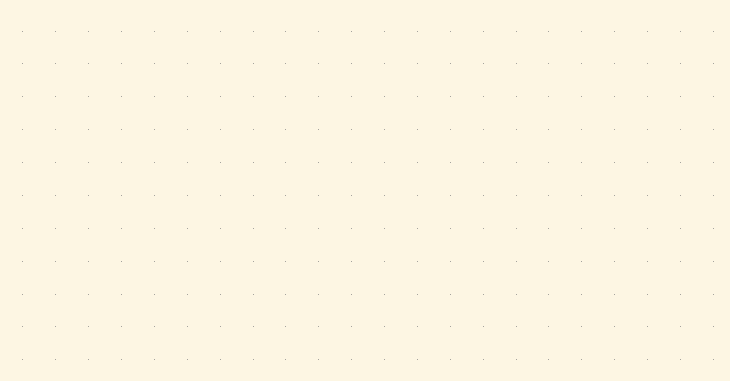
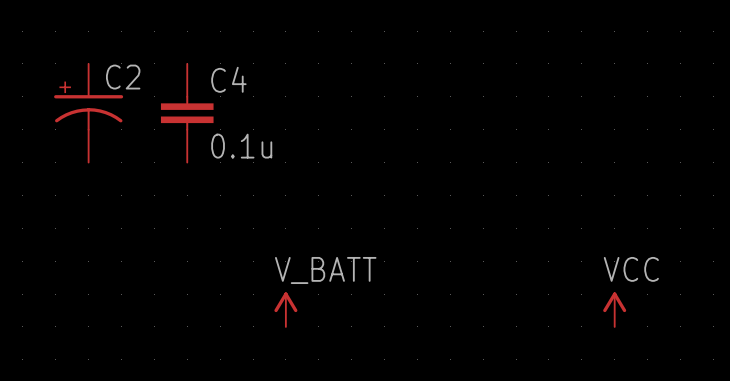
C2: none -> (88, 113)
C4: none -> 0.1u (187, 113)
power symbol: none -> V_BATT (285, 309)
power symbol: none -> VCC (614, 309)

